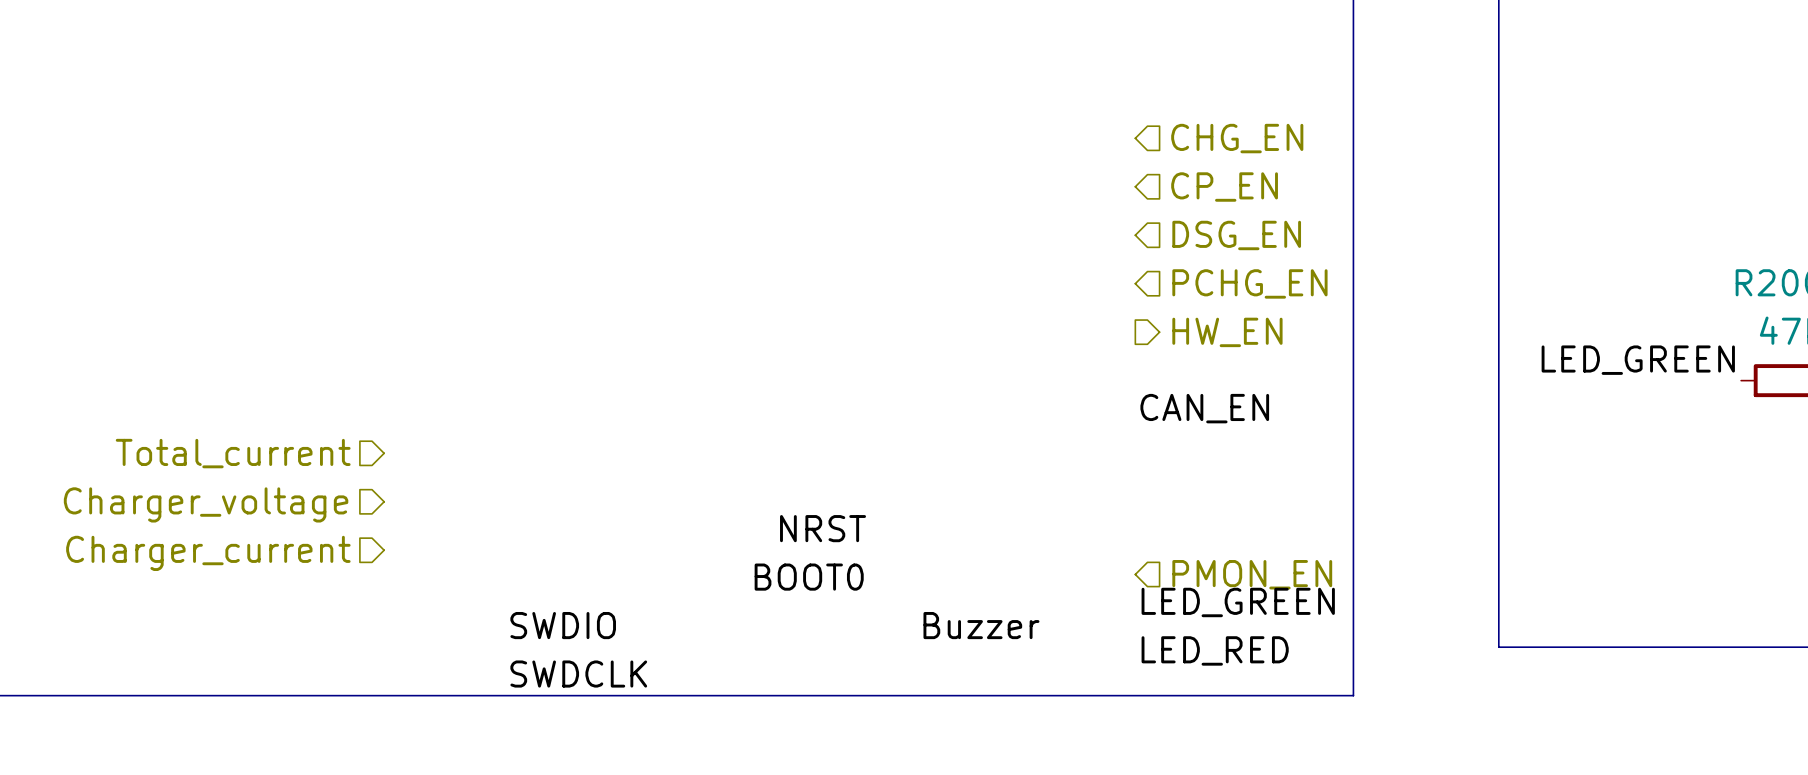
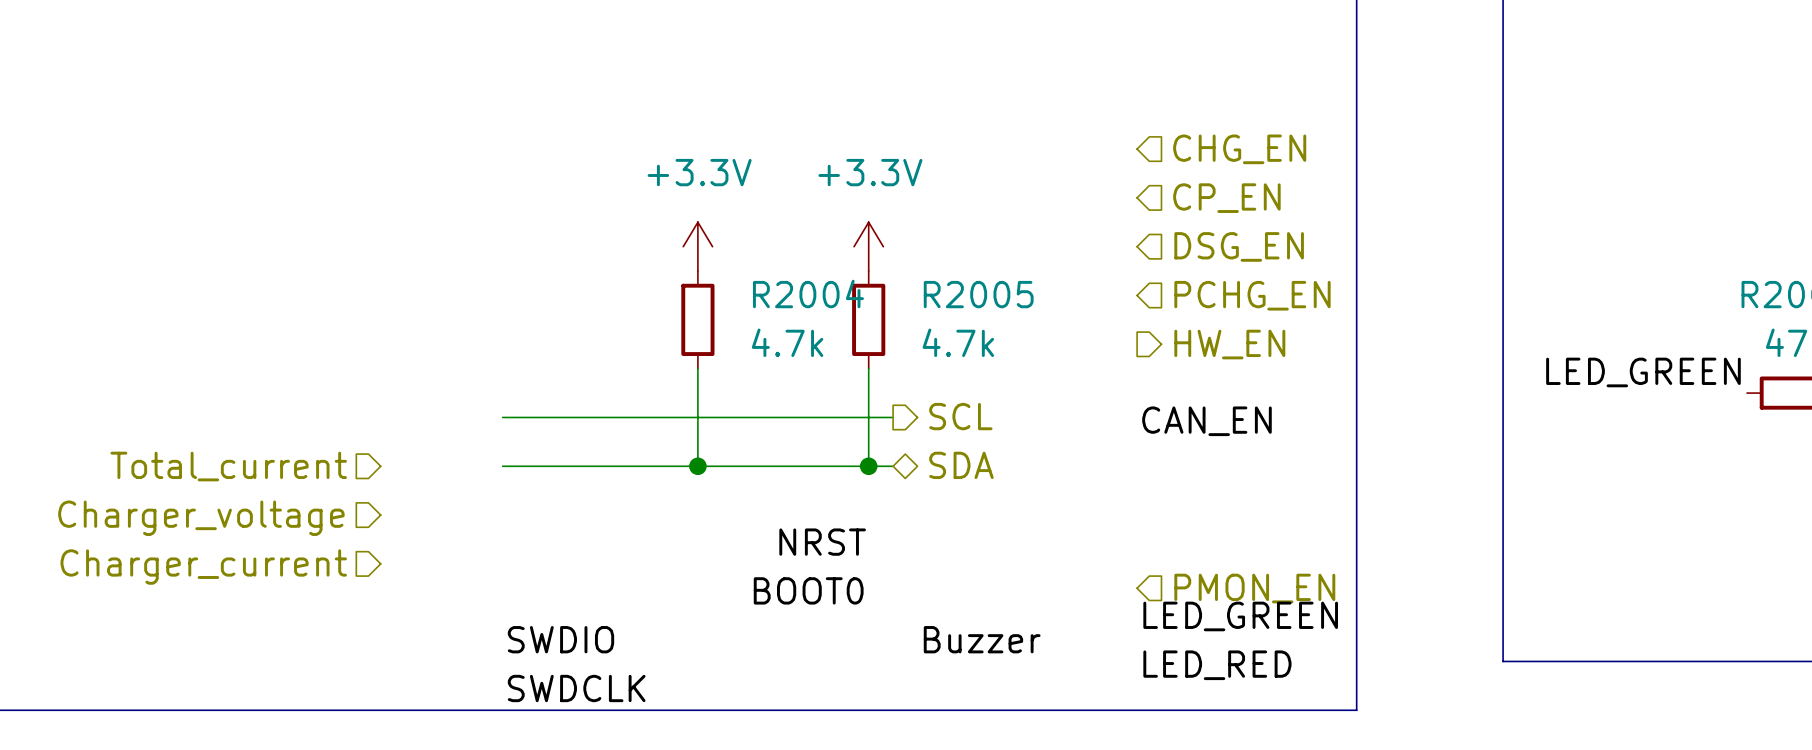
power symbol: none -> +3.3V (697, 246)
power symbol: none -> +3.3V (868, 246)
R2004: none -> 4.7k (697, 319)
R2005: none -> 4.7k (868, 319)
wire: none -> (697, 368) (697, 466)
wire: none -> (868, 368) (868, 466)
hierarchical label: none -> SCL (960, 416)
wire: none -> (502, 417) (893, 417)
hierarchical label: none -> SDA (961, 465)
wire: none -> (502, 466) (893, 466)
junction: none -> (697, 466)
junction: none -> (868, 466)

